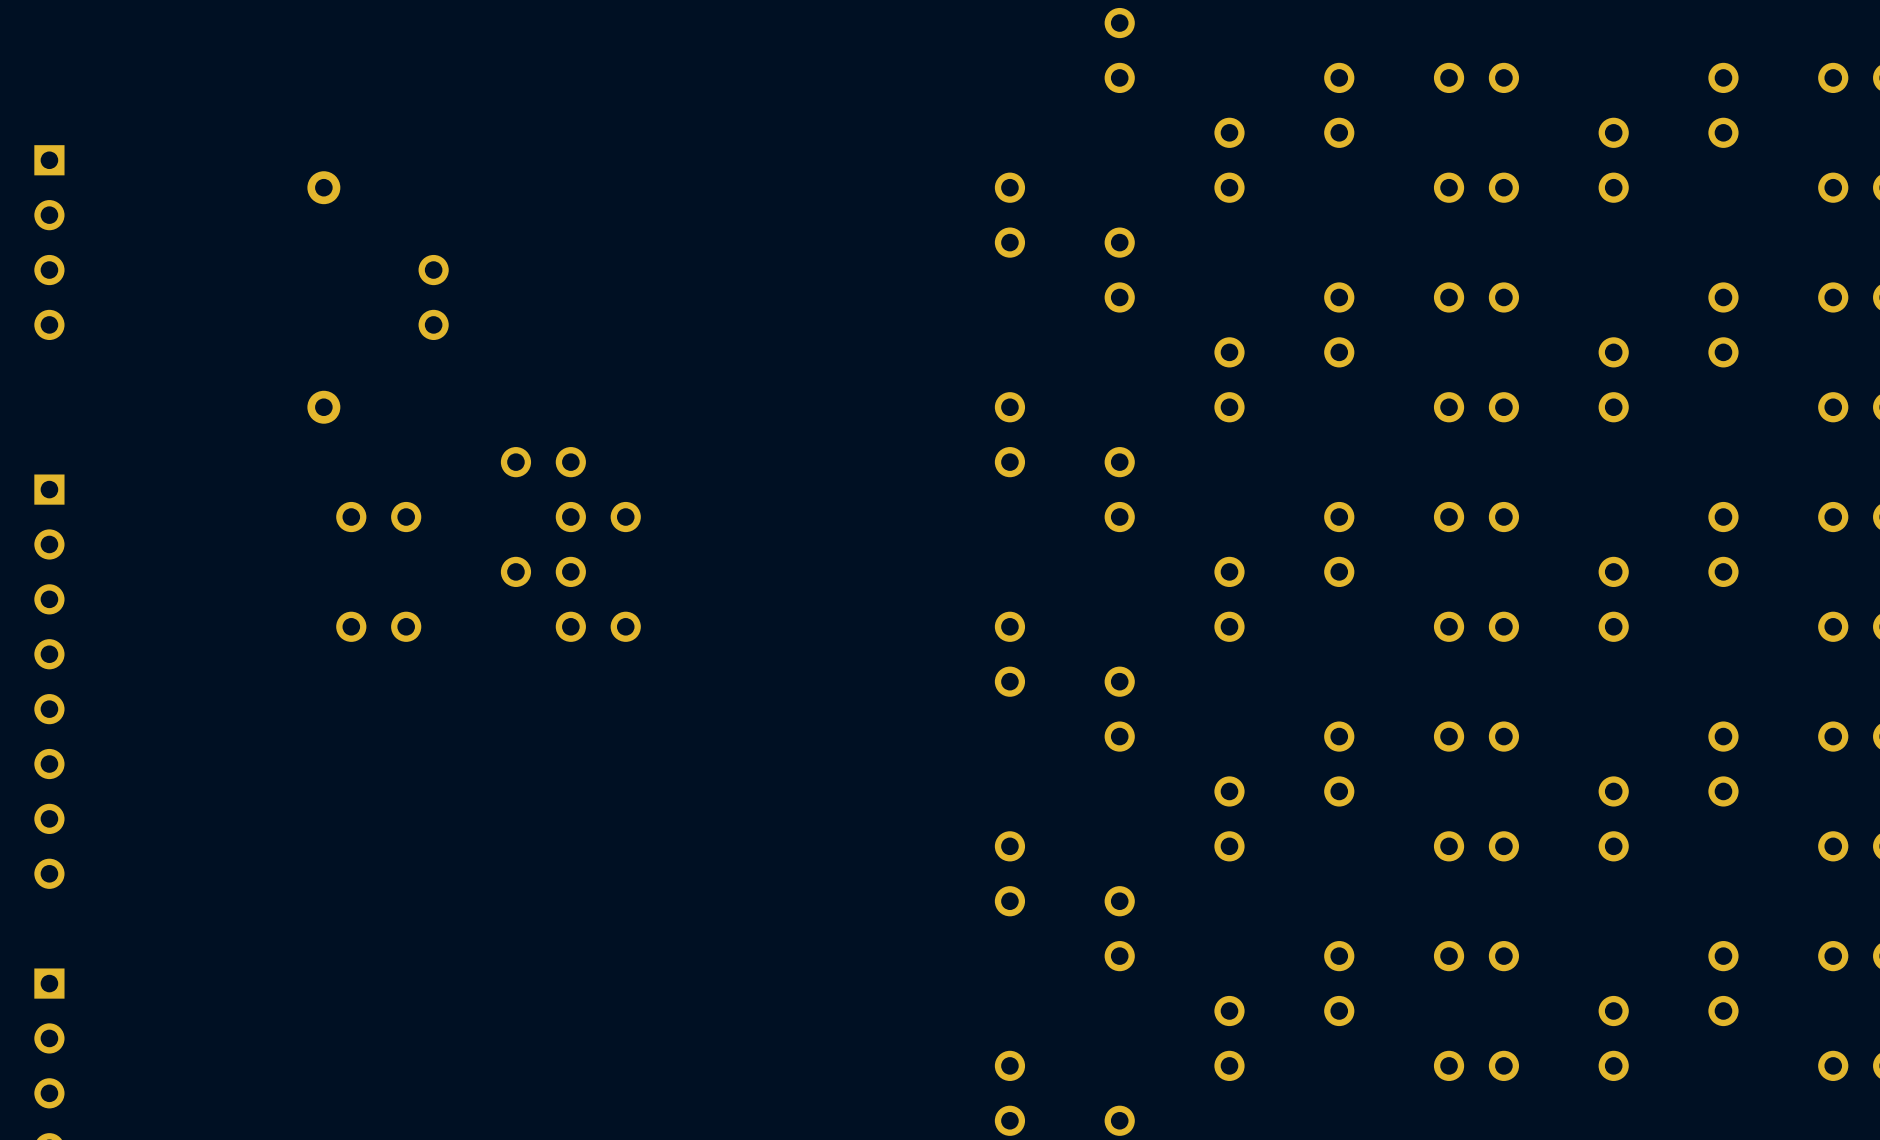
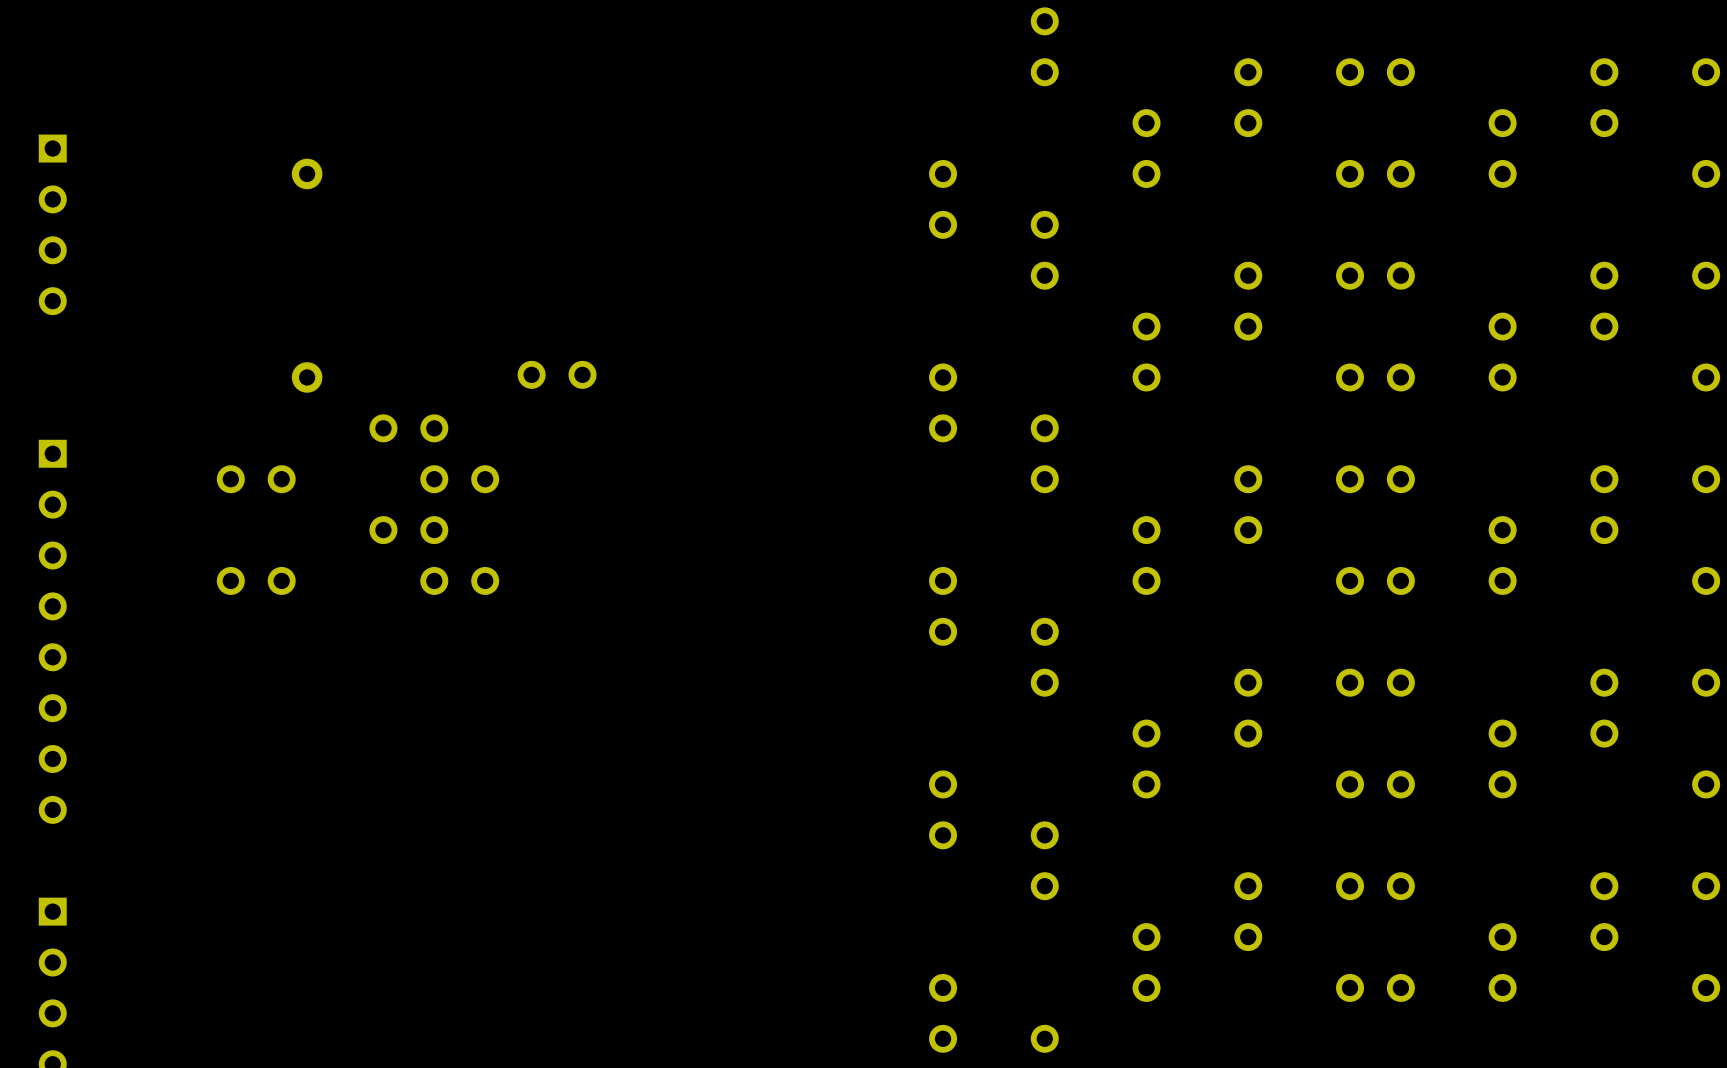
part: (433, 297) -> none
part: none -> (557, 374)
part: none -> (408, 428)
part: (543, 462) -> none
part: none -> (256, 479)
part: (378, 517) -> none
part: none -> (459, 479)
part: (598, 517) -> none
part: none -> (408, 530)
part: (543, 571) -> none
part: none -> (256, 580)
part: (378, 626) -> none
part: none -> (459, 580)
part: (598, 626) -> none

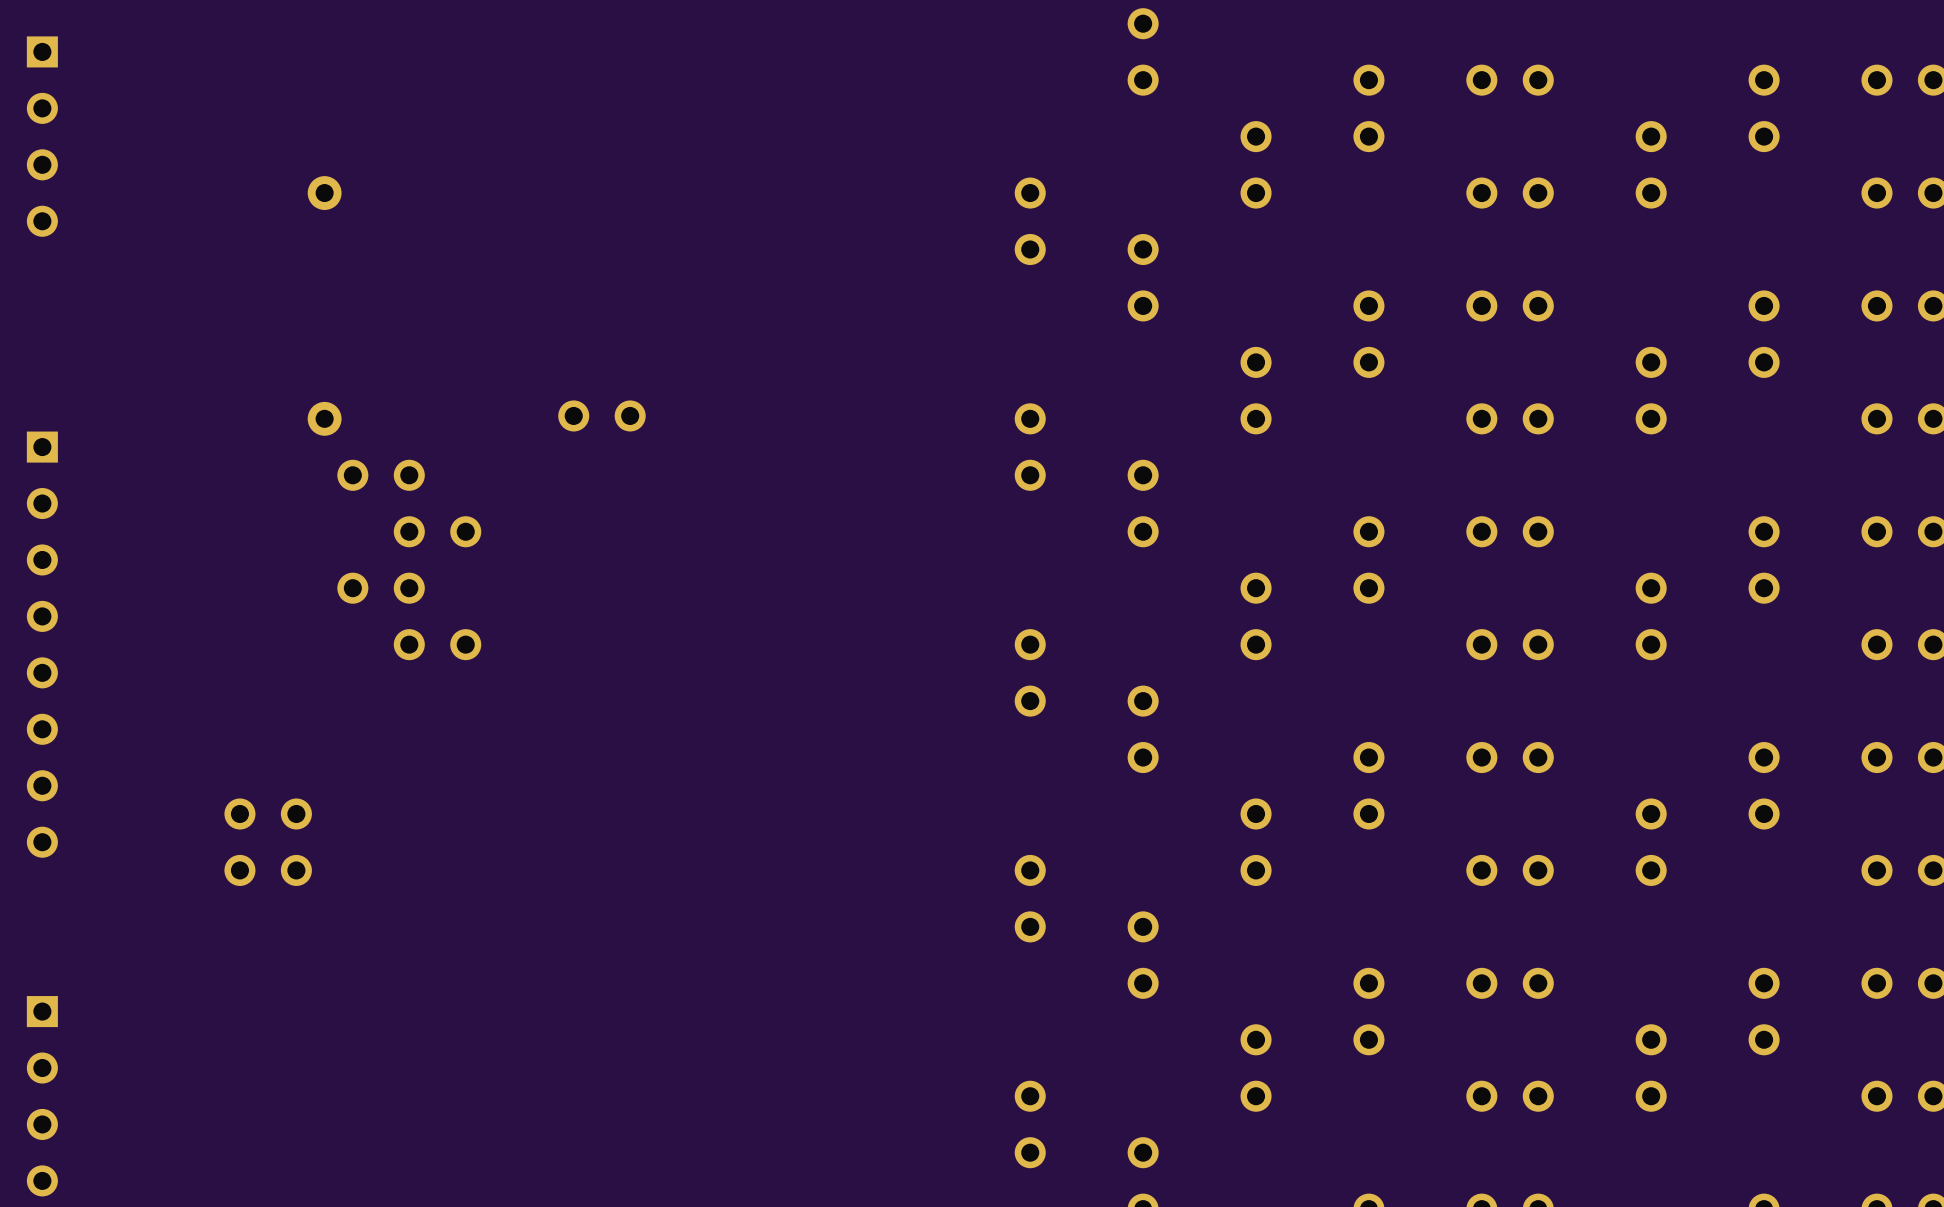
part position: (52, 224) -> (42, 136)
part: none -> (381, 475)
part: (408, 428) -> none
part: (256, 479) -> none
part: none -> (437, 531)
part: (459, 479) -> none
part: none -> (381, 588)
part: (408, 530) -> none
part: (256, 580) -> none
part: none -> (437, 644)
part: (459, 580) -> none
part position: (52, 631) -> (42, 644)
part: none -> (268, 813)
part: none -> (268, 870)

